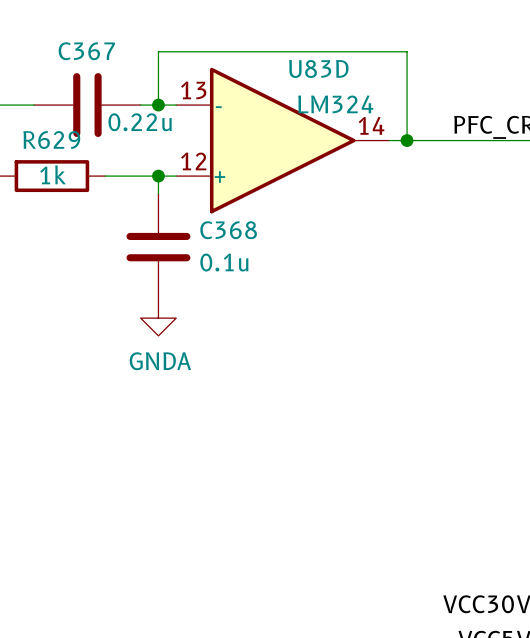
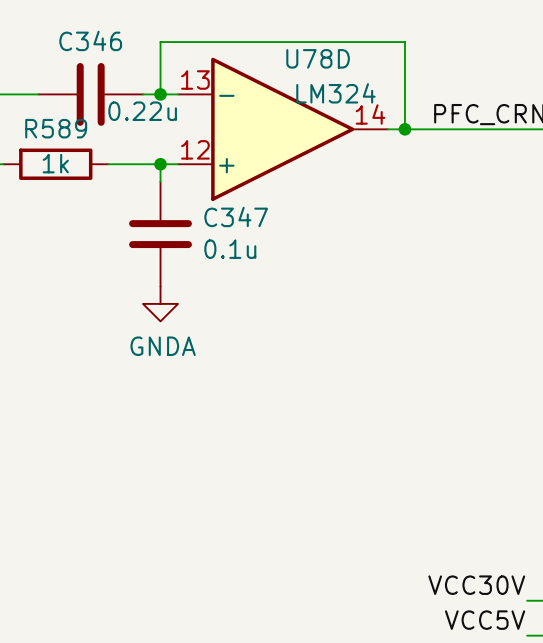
C367 name: C367 (86, 51) -> C346 (90, 40)
U83D name: U83D (318, 68) -> U78D (318, 58)
R629 name: R629 (51, 140) -> R589 (56, 128)
C368 name: C368 (228, 230) -> C347 (236, 216)

